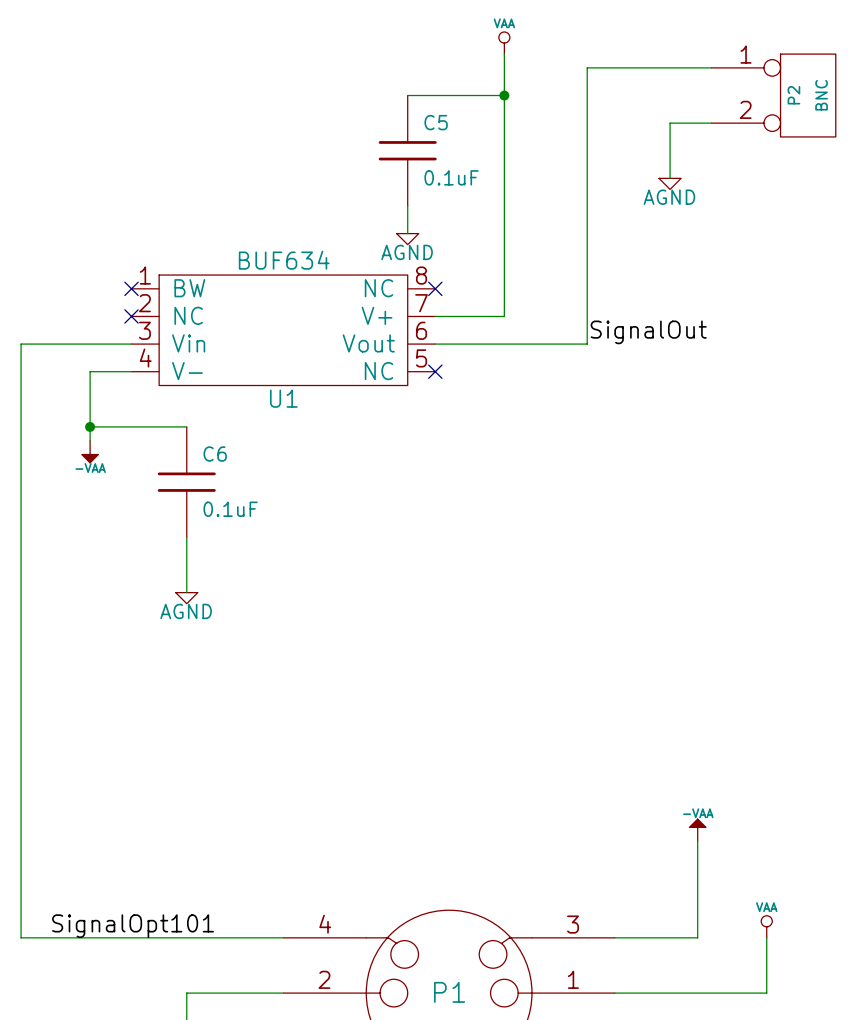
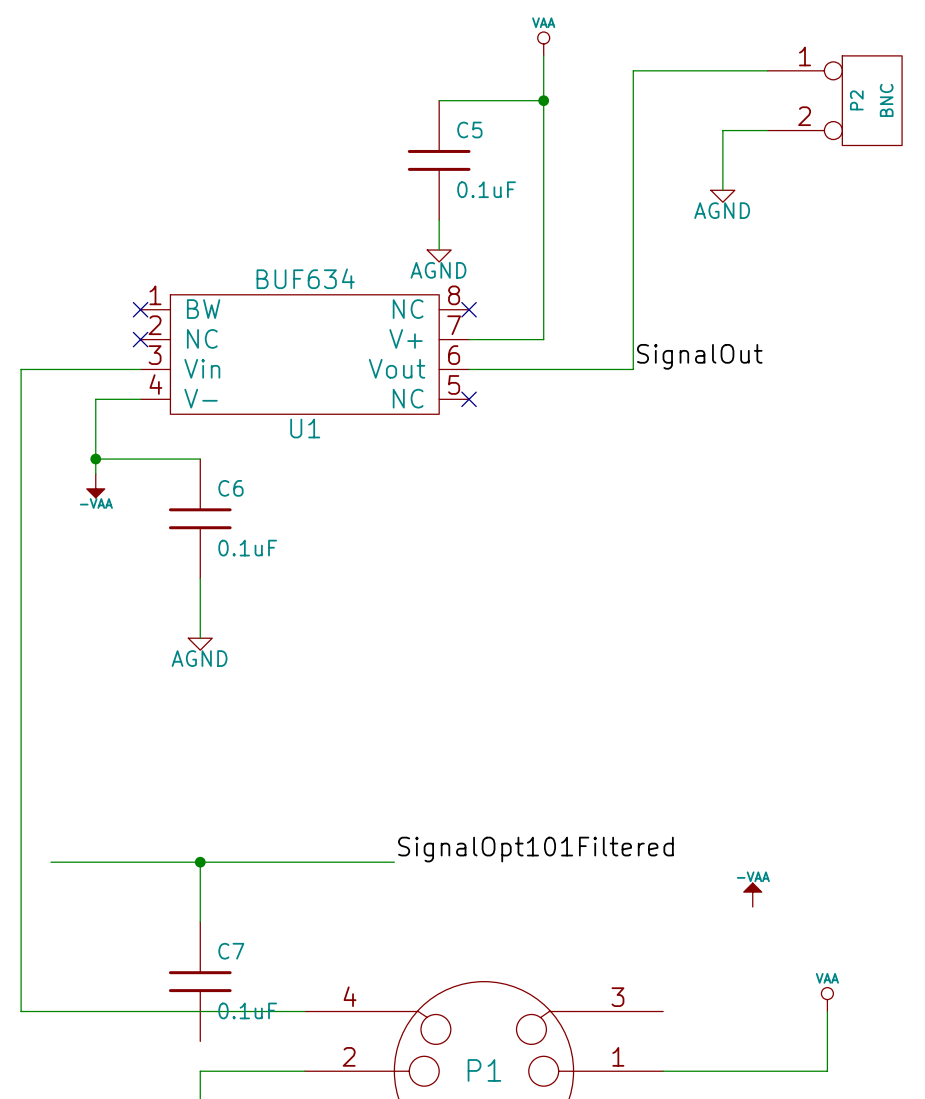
label: none -> SignalOpt101Filtered (535, 849)
wire: none -> (50, 862) (394, 862)
wire: none -> (200, 862) (200, 921)
junction: none -> (200, 862)
wire: (697, 841) (697, 937) (614, 937) -> none
C7: none -> 0.1uF (200, 981)
label: SignalOpt101 (133, 926) -> none

